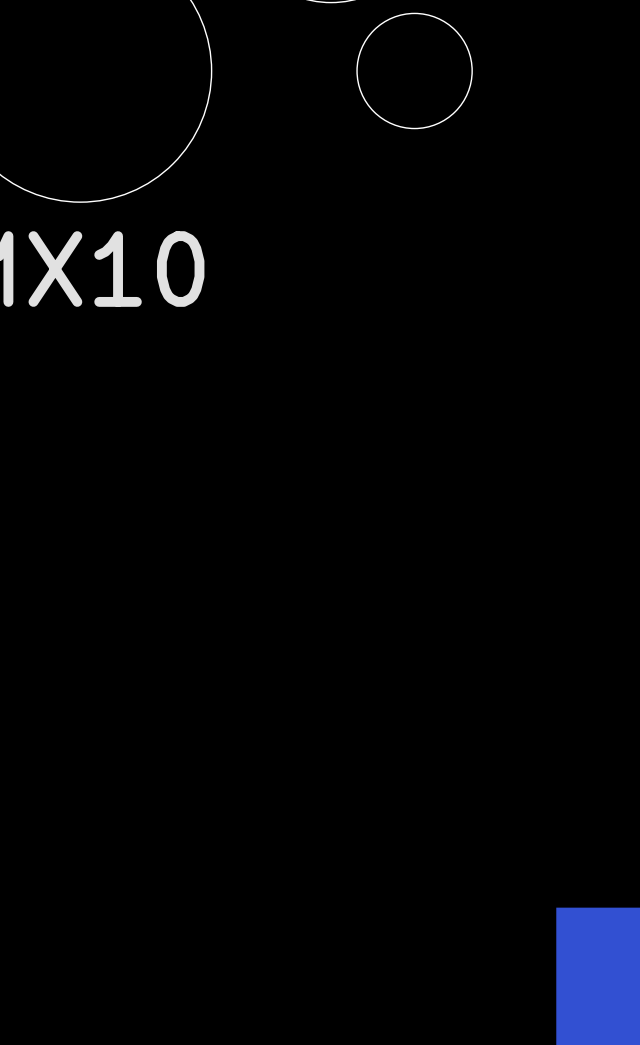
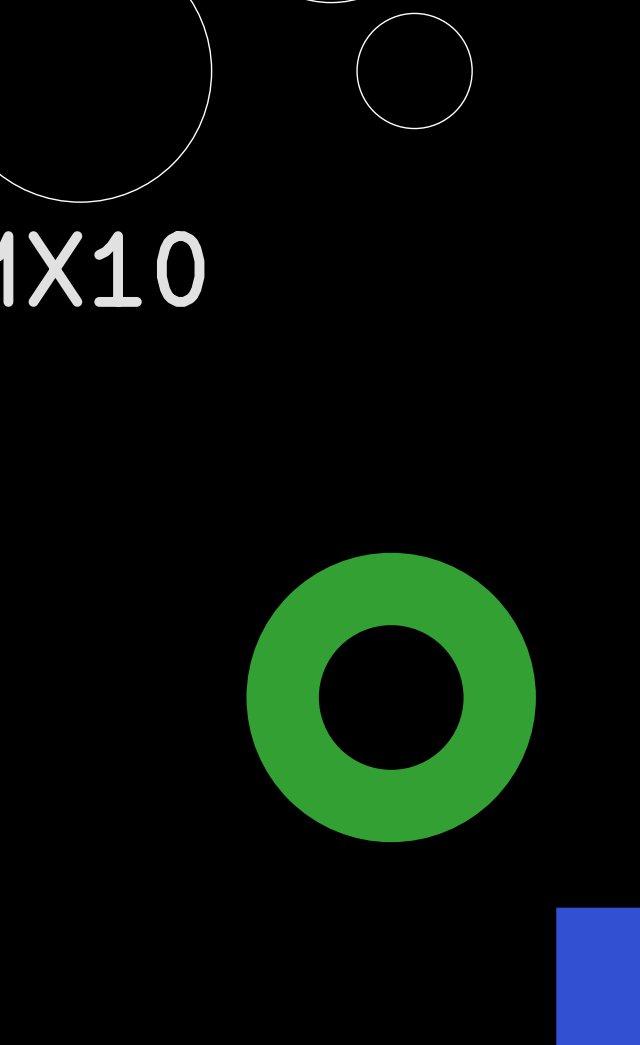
part: none -> (391, 697)

